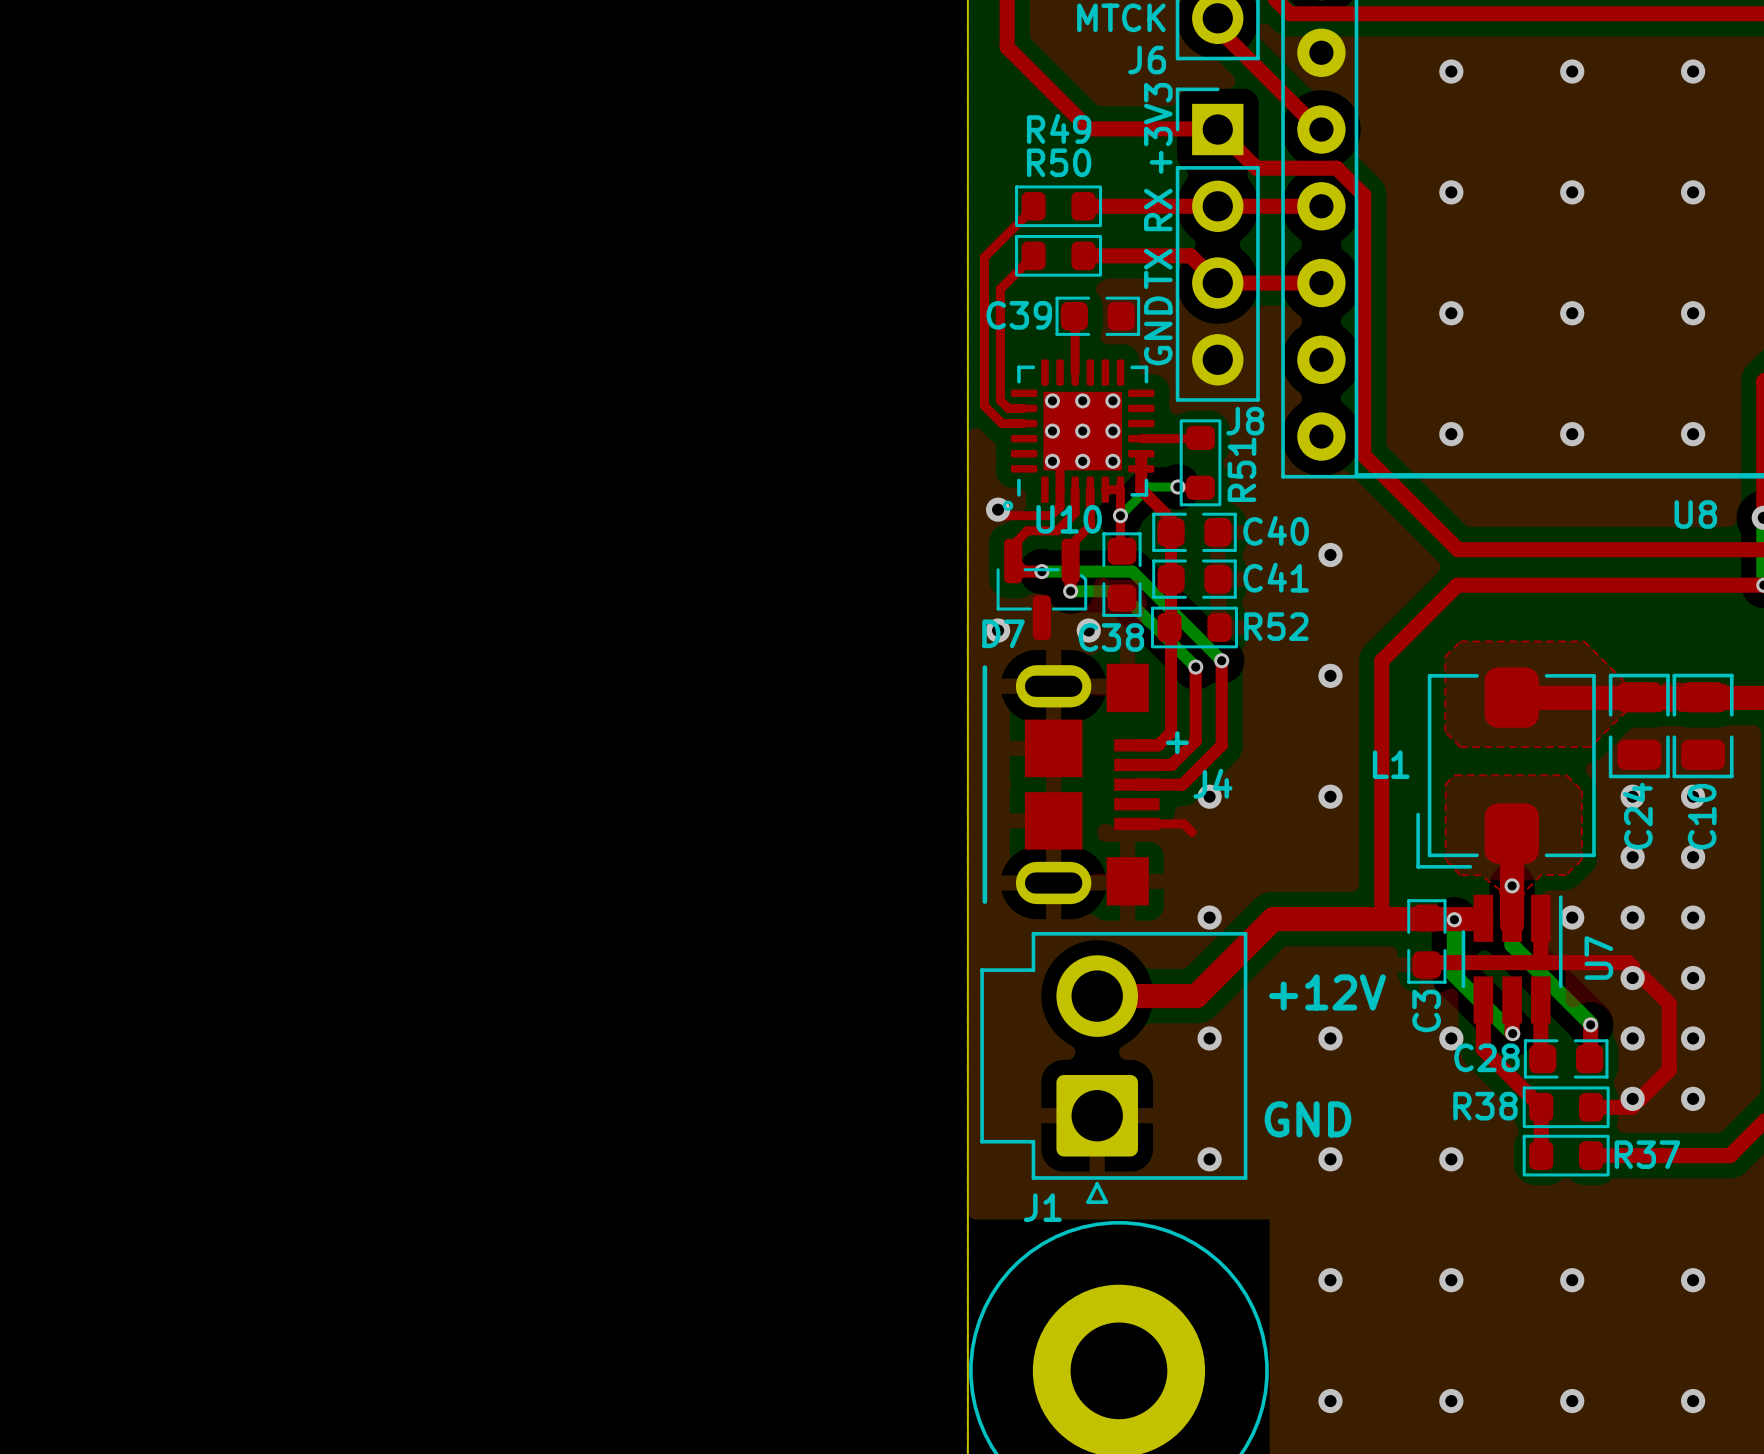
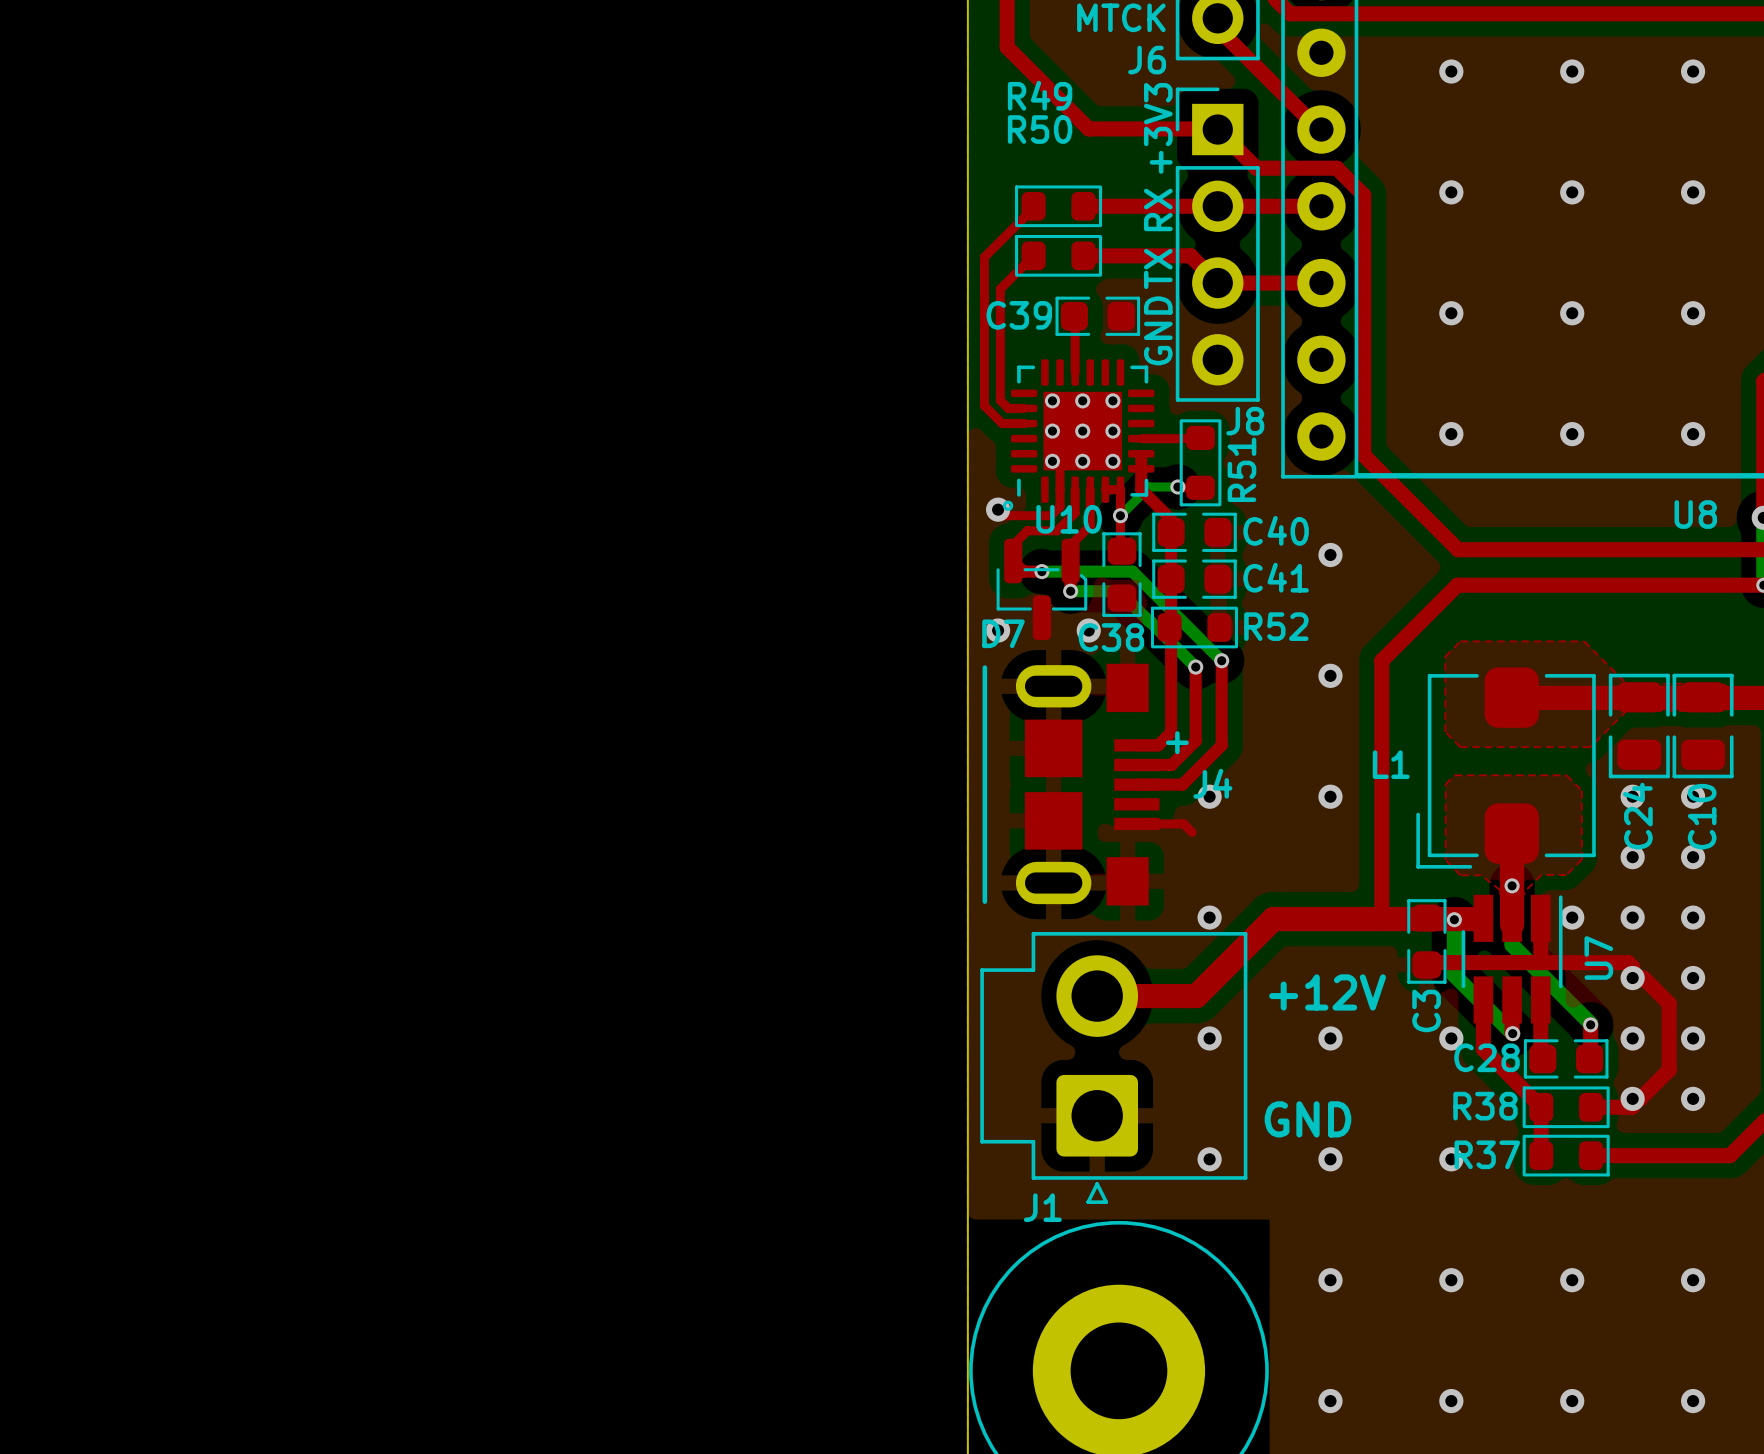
R49 name position: R49 (1059, 128) -> R49 (1040, 95)
R50 name position: R50 (1059, 162) -> R50 (1040, 129)
R37 name position: R37 (1647, 1154) -> R37 (1487, 1154)

